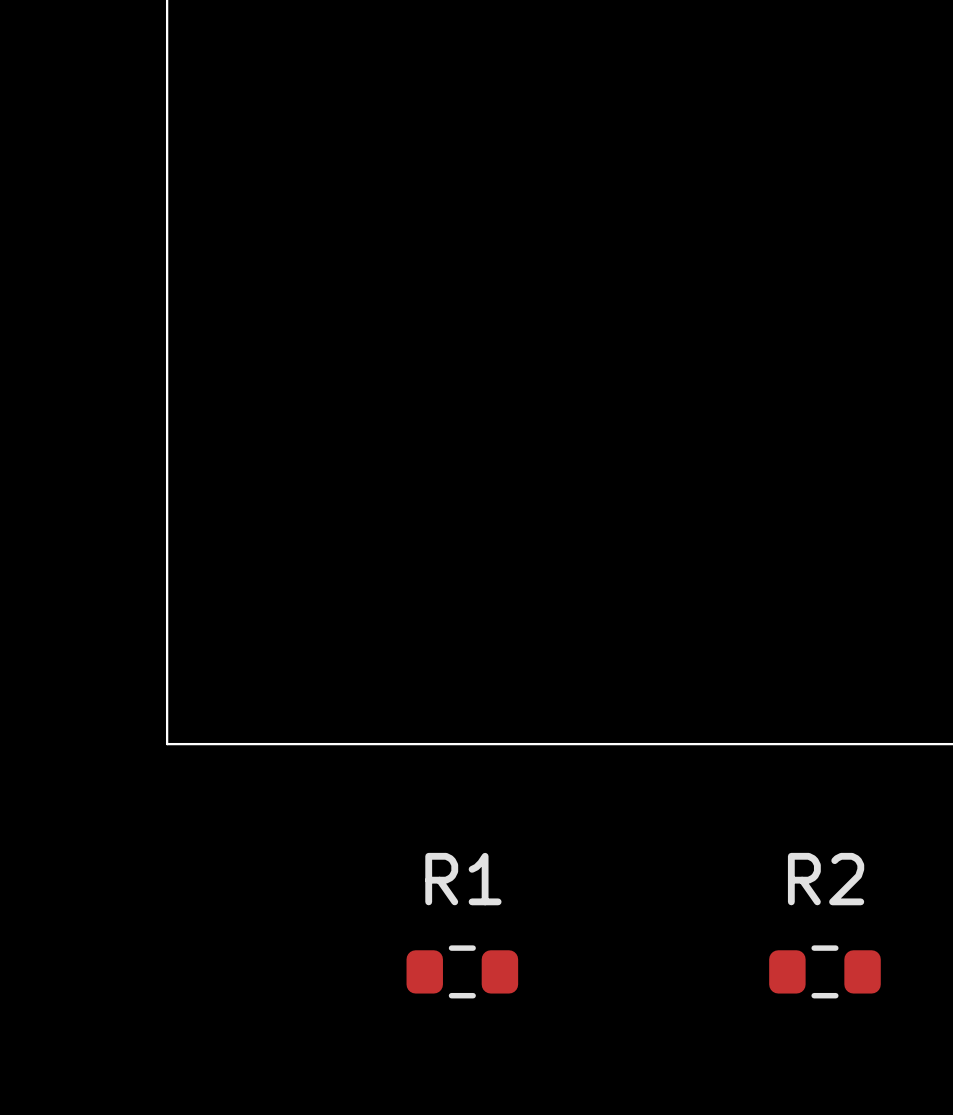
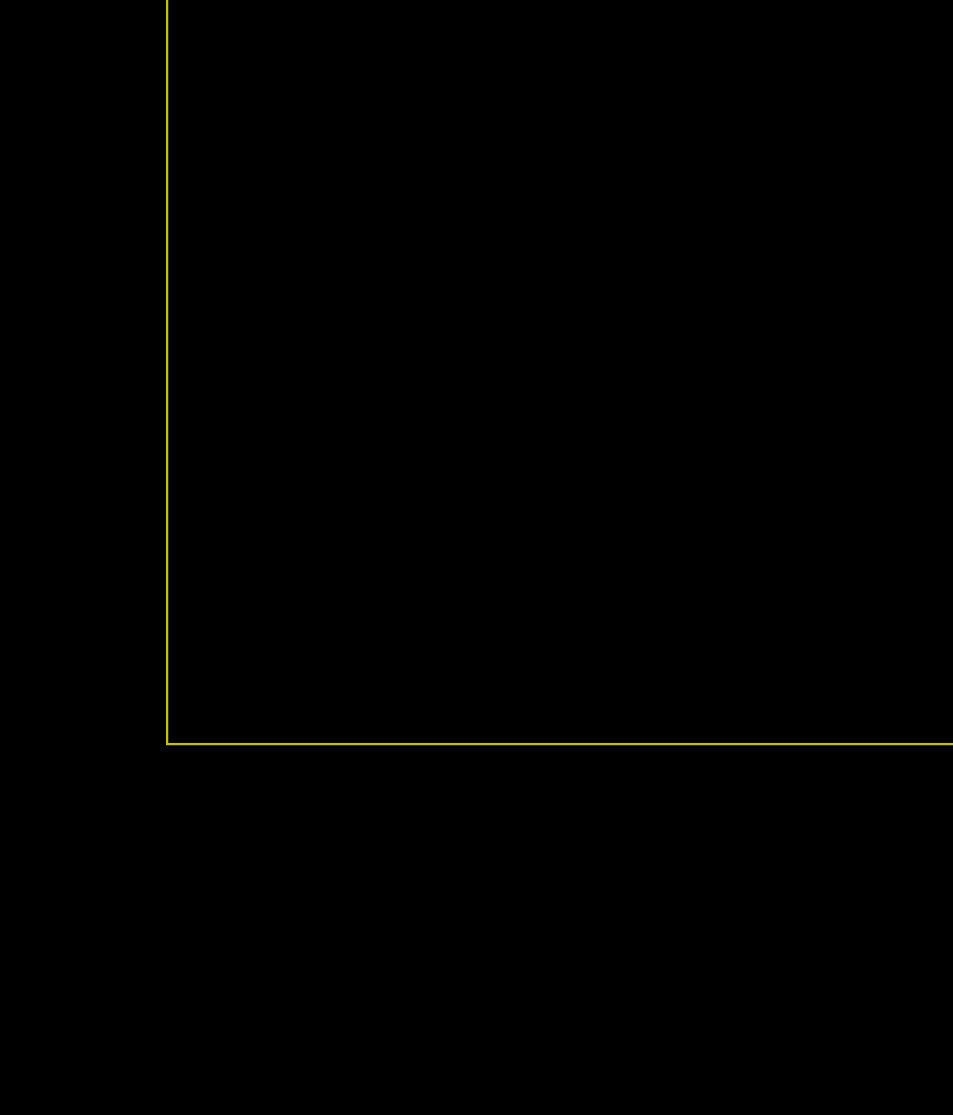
R1: (462, 971) -> none
R2: (824, 971) -> none

